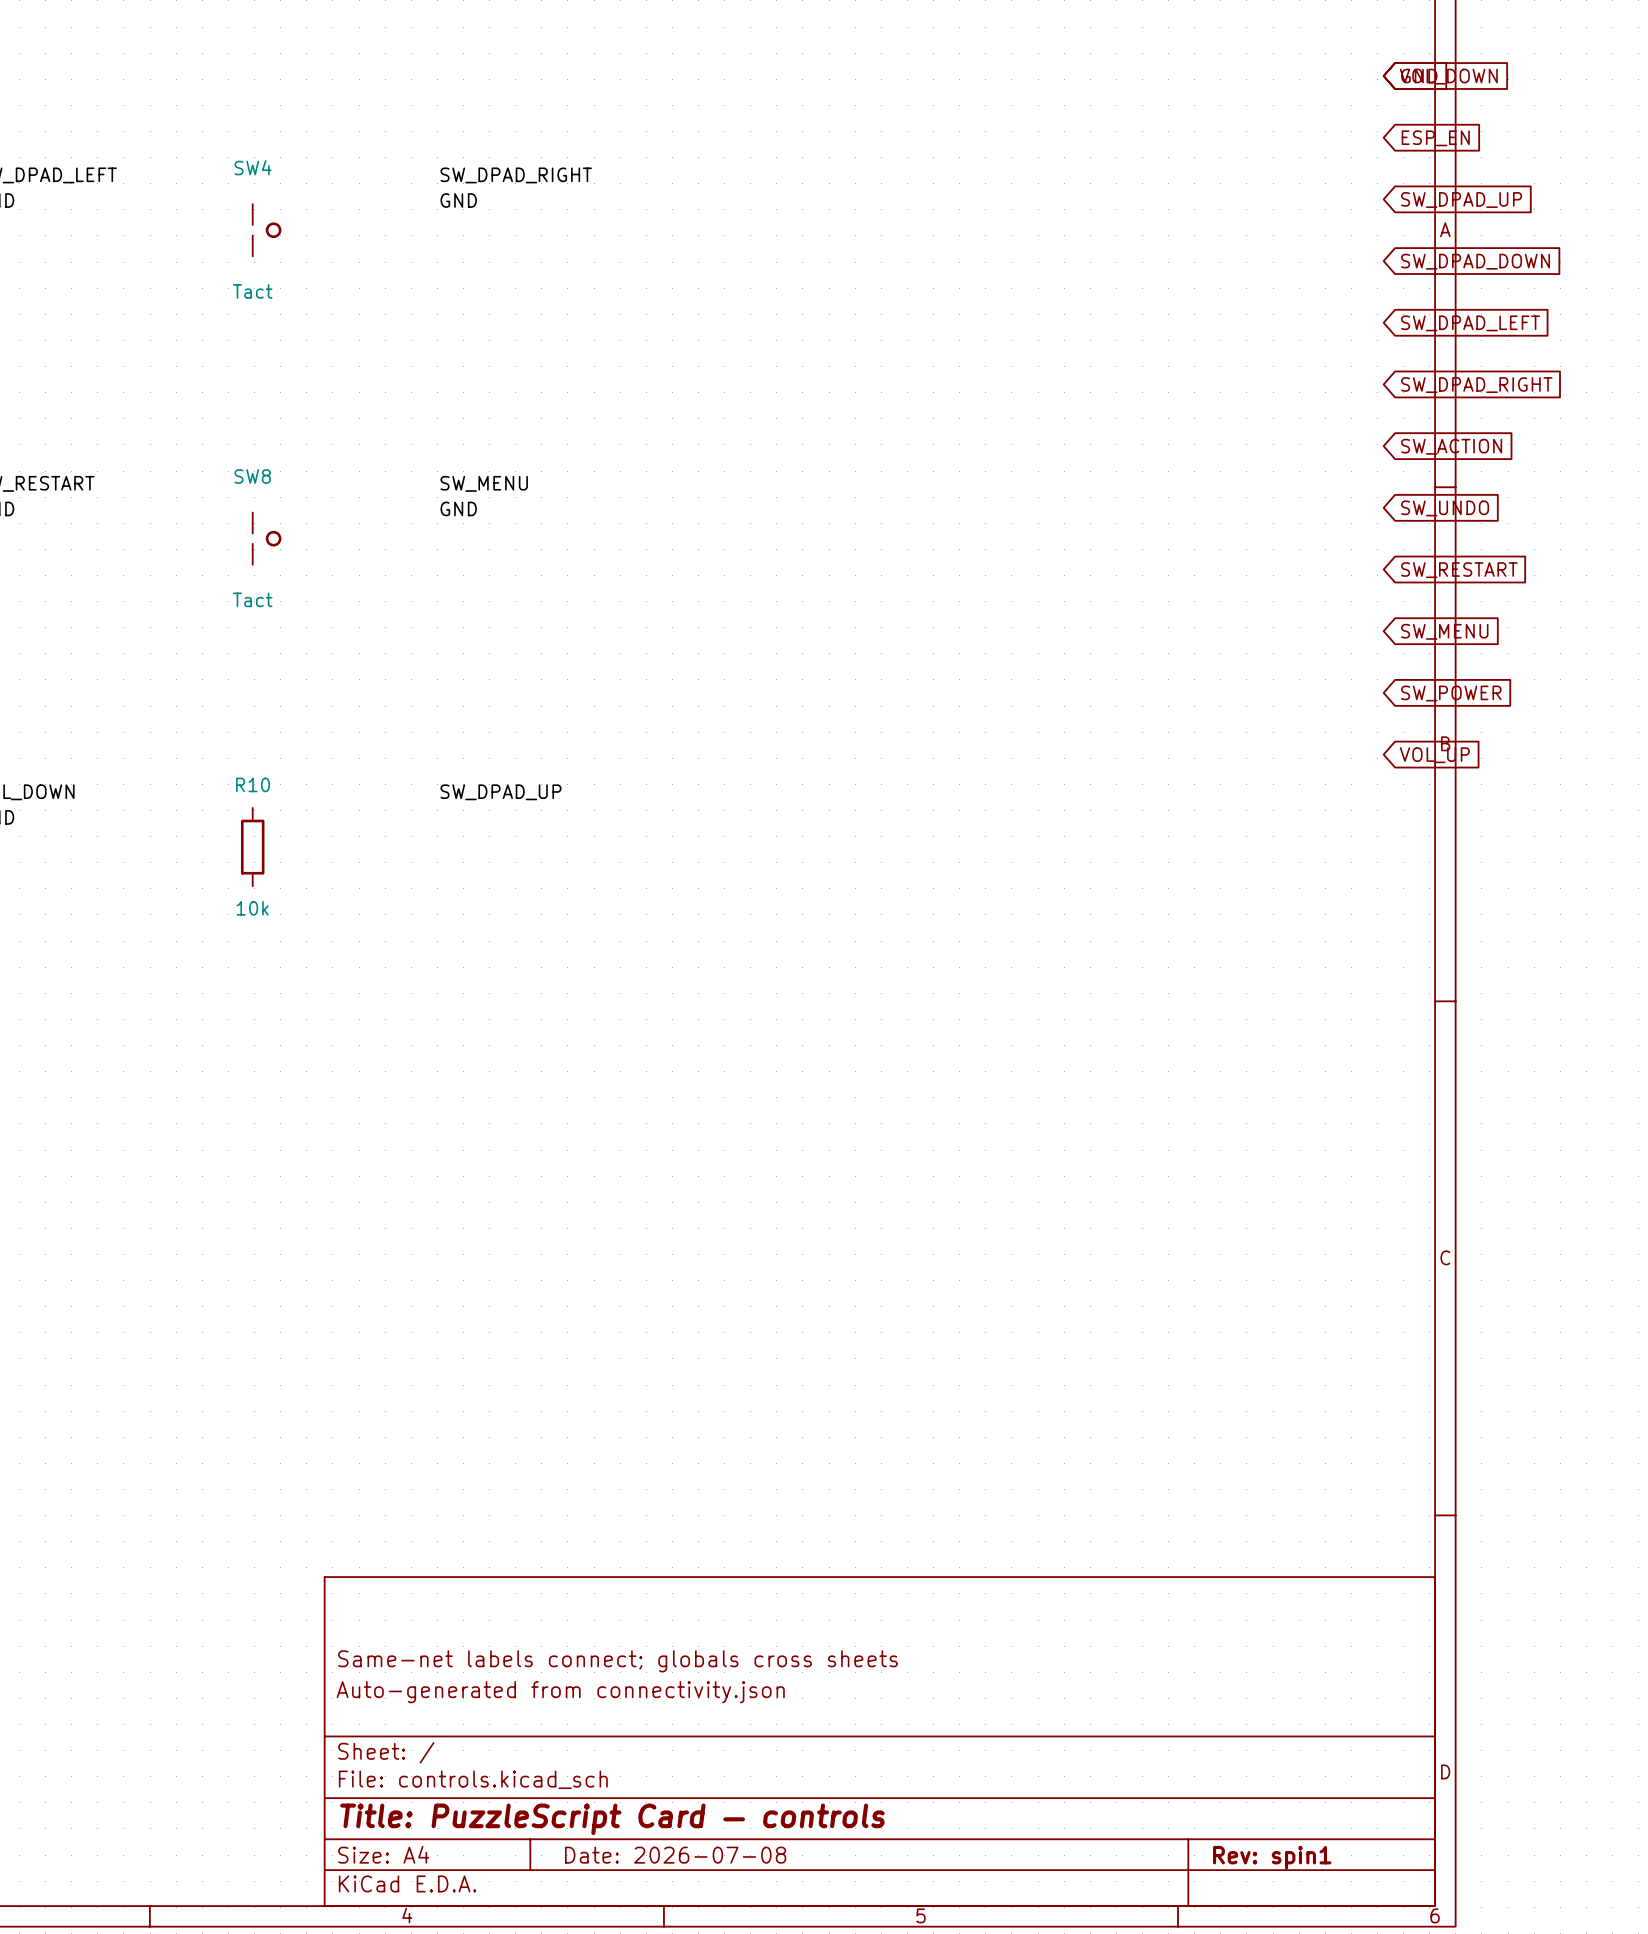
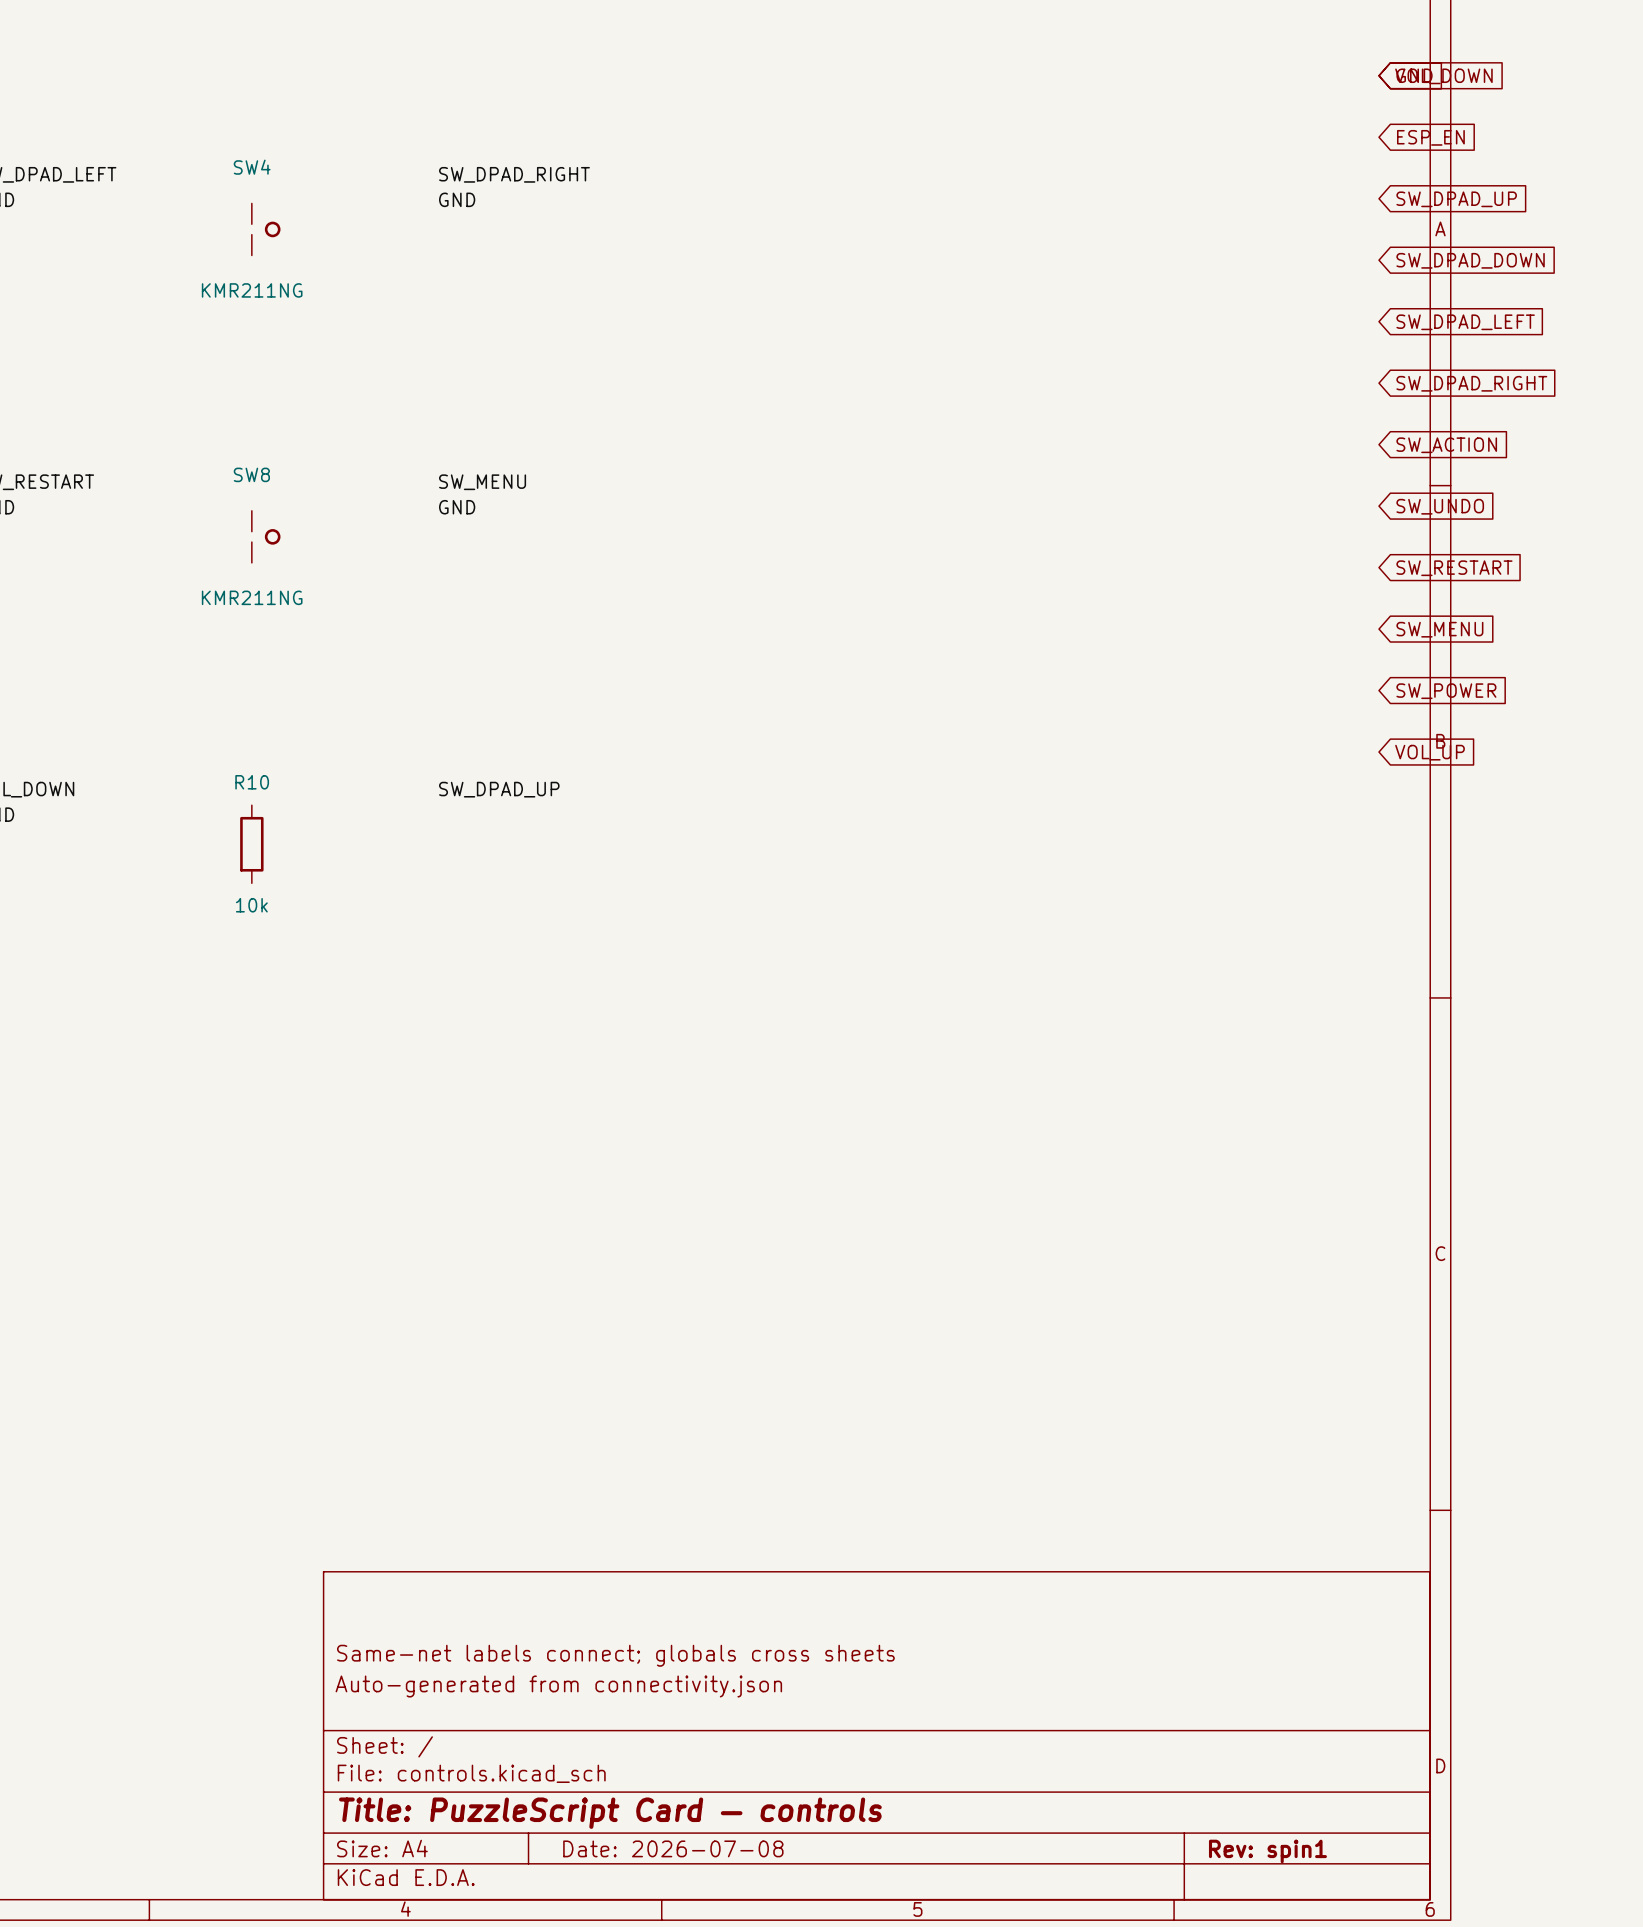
SW4 value: Tact (252, 291) -> KMR211NG (252, 290)
SW8 value: Tact (252, 599) -> KMR211NG (252, 597)

